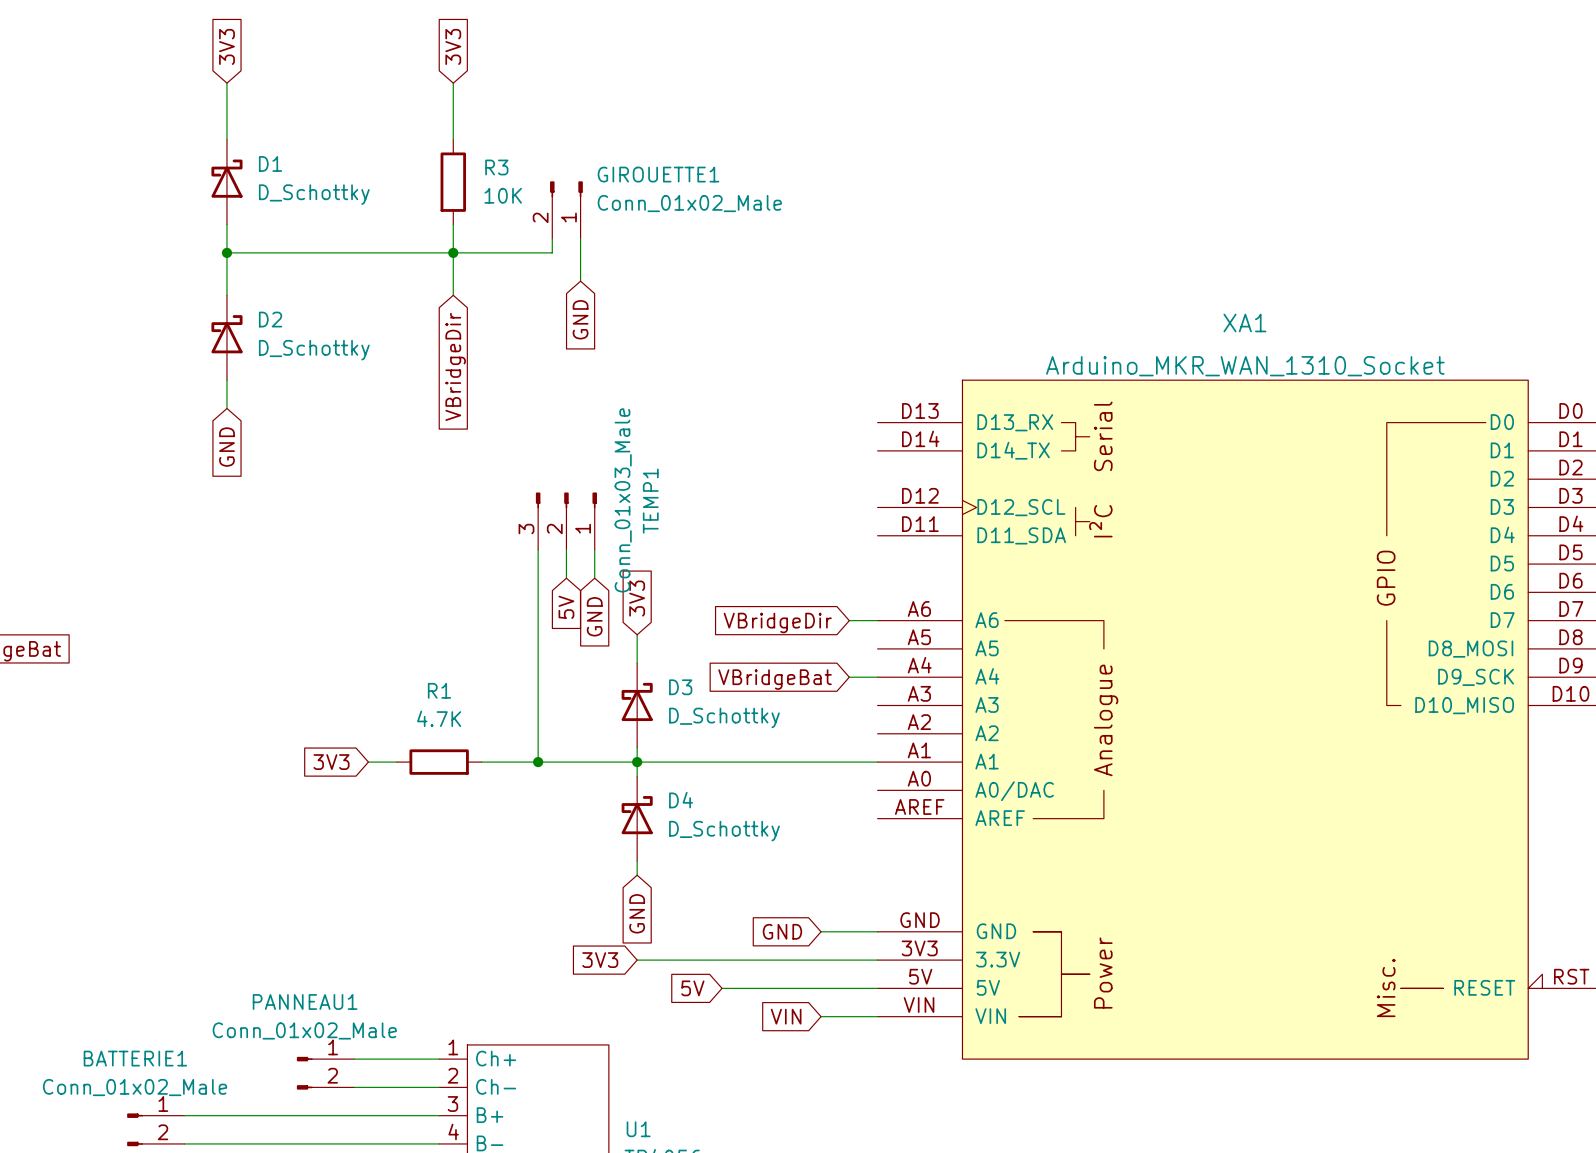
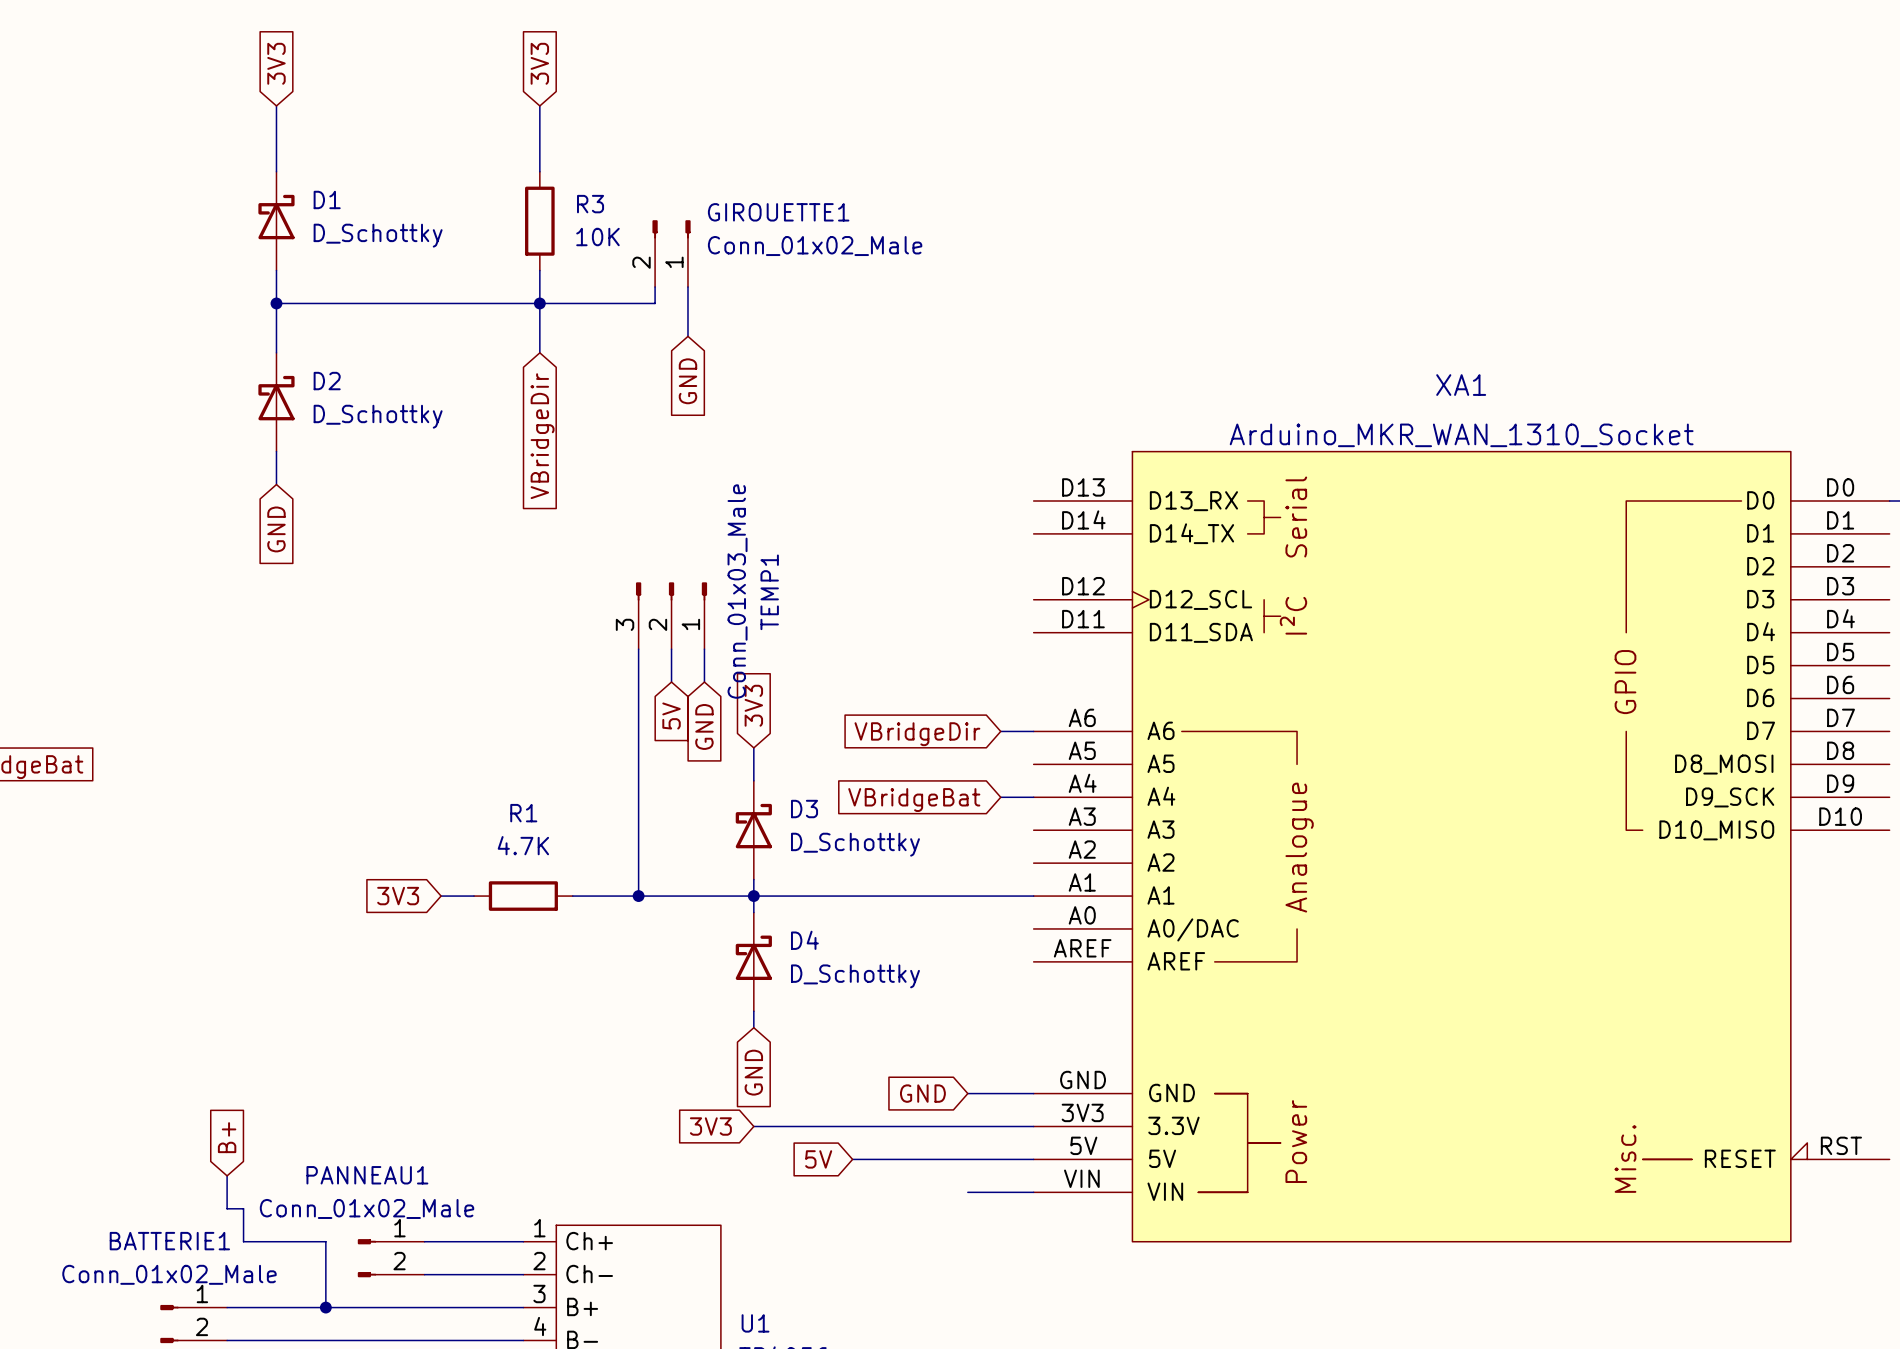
global label: none -> B+ (227, 1137)
wire: none -> (227, 1175) (227, 1208) (243, 1208) (243, 1241) (325, 1241) (325, 1307)
global label: VIN (786, 1016) -> none
junction: none -> (325, 1307)

